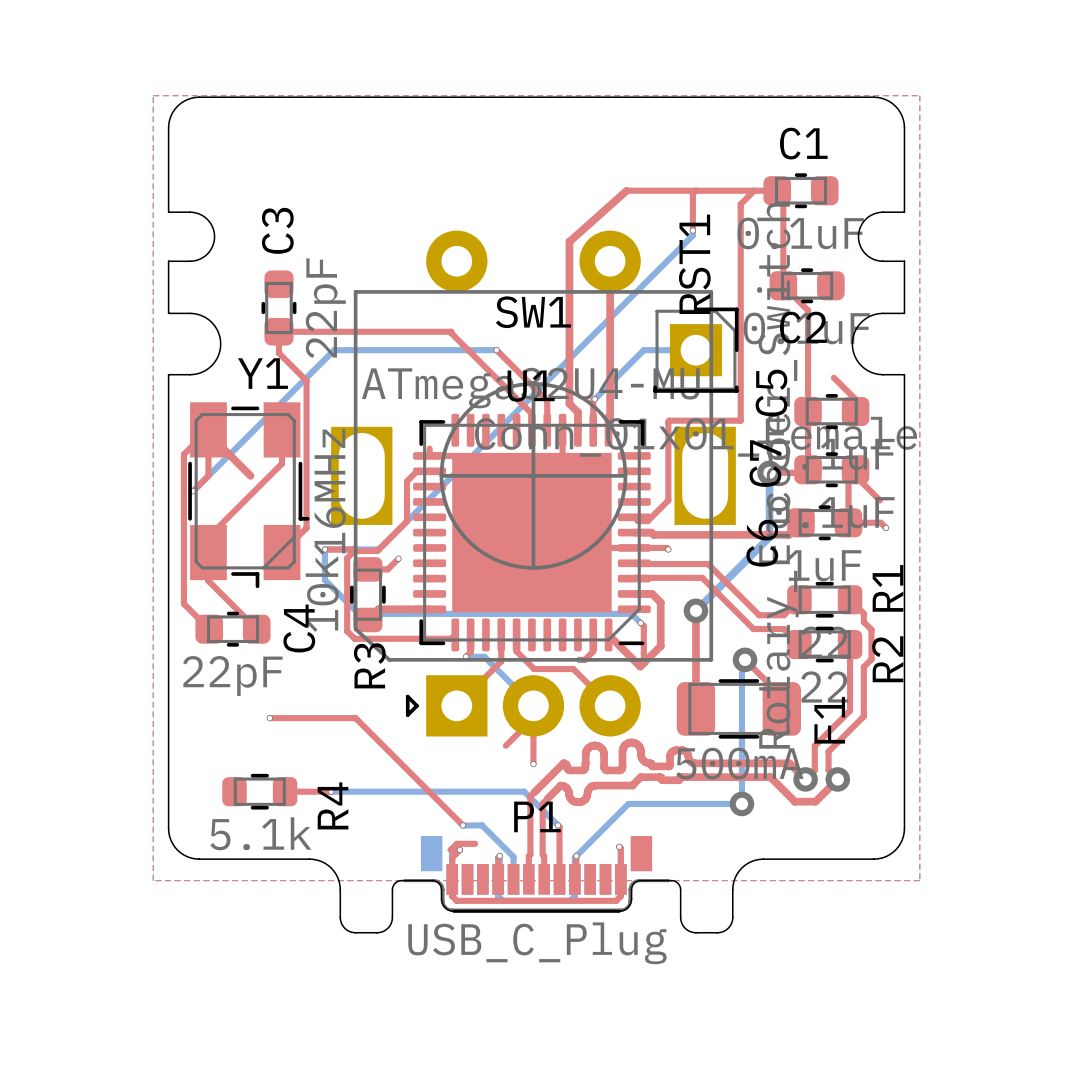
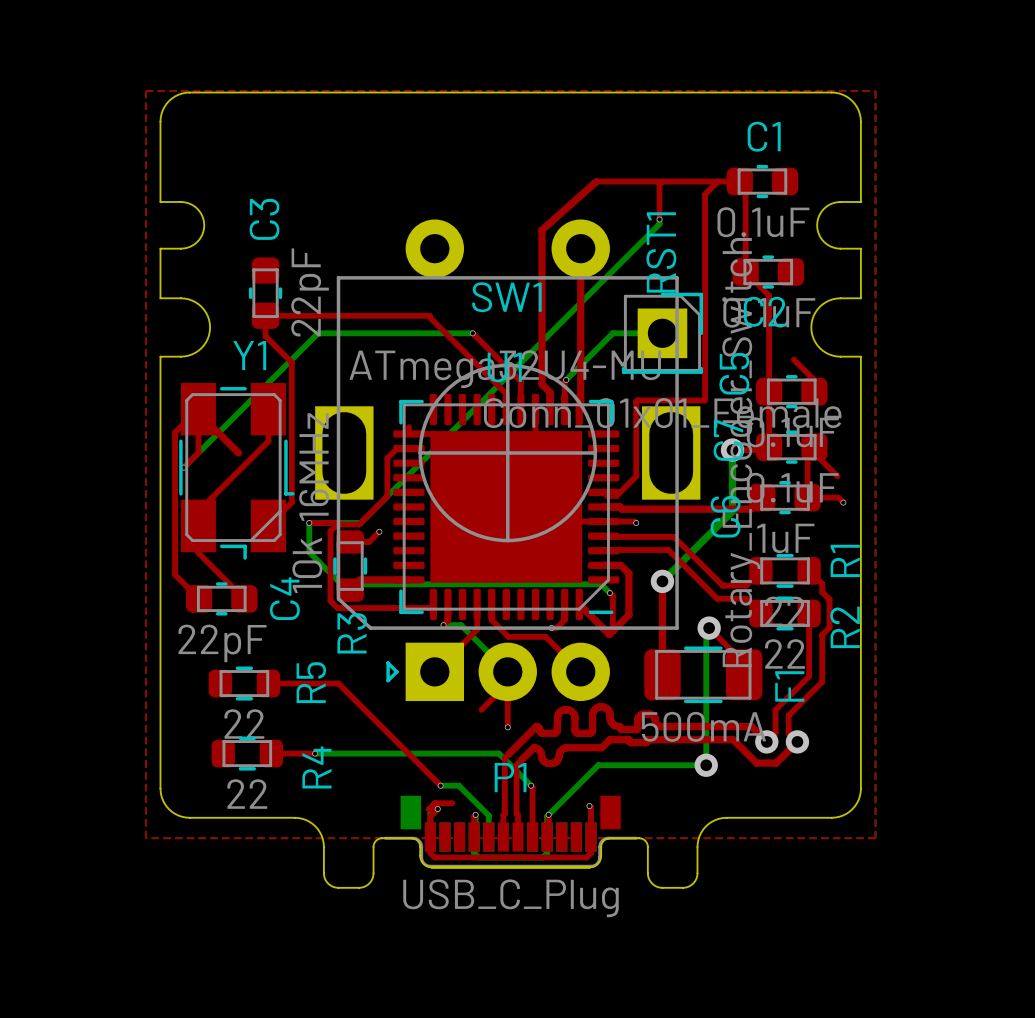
R5: none -> 22 (244, 683)
top track: (269, 718) (282, 718) -> none
via: (269, 718) -> none
R4 value: 5.1k (260, 833) -> 22 (247, 794)

